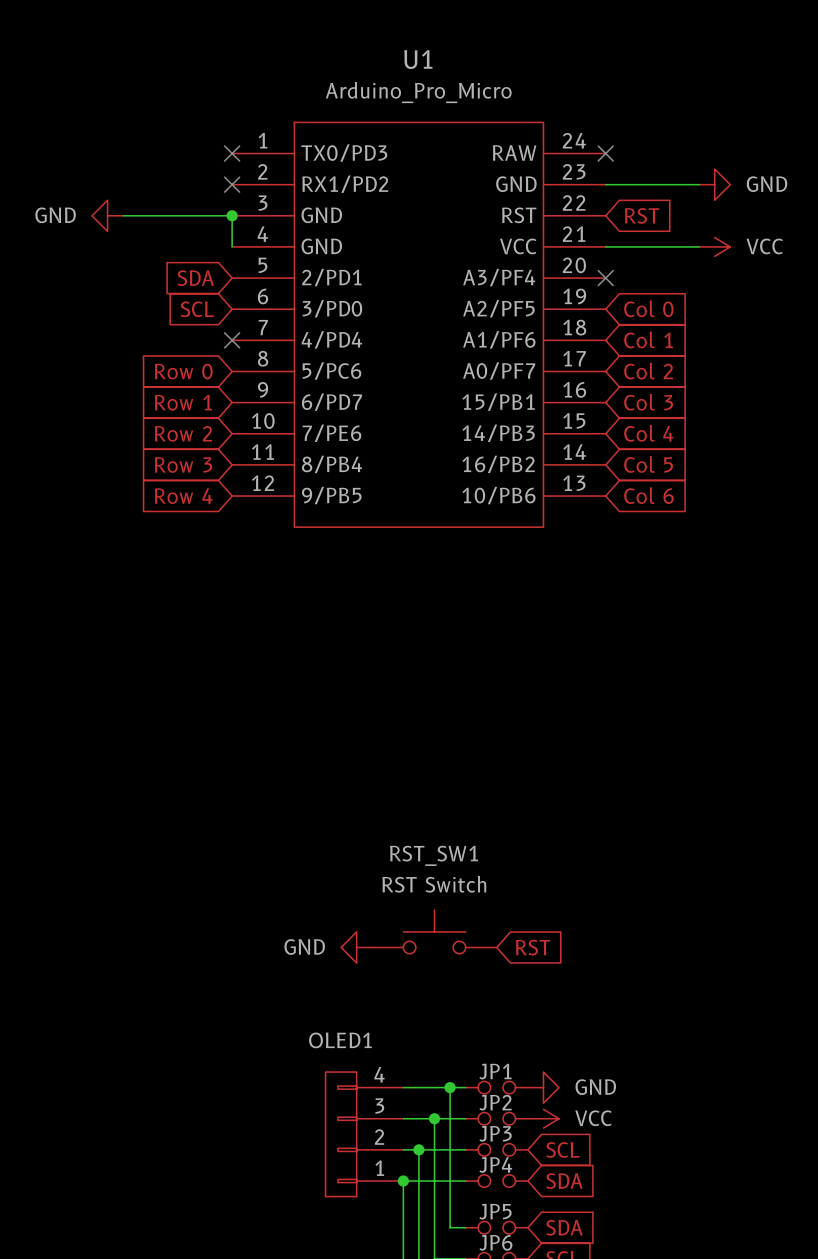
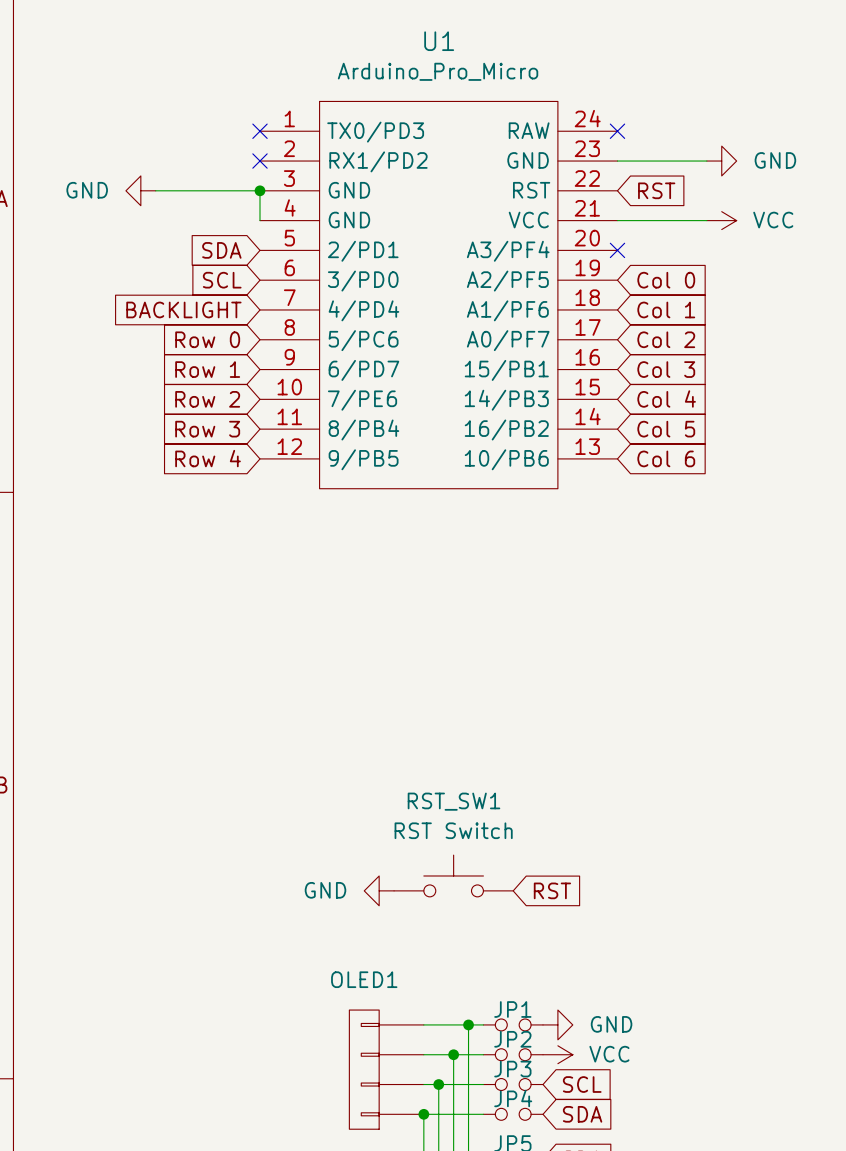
global label: none -> BACKLIGHT (183, 309)
no-connect mark: (232, 340) -> none
OLED1 pin number: 4 (379, 1074) -> none
OLED1 pin number: 3 (379, 1106) -> none
OLED1 pin number: 2 (379, 1137) -> none
OLED1 pin number: 1 (379, 1168) -> none

